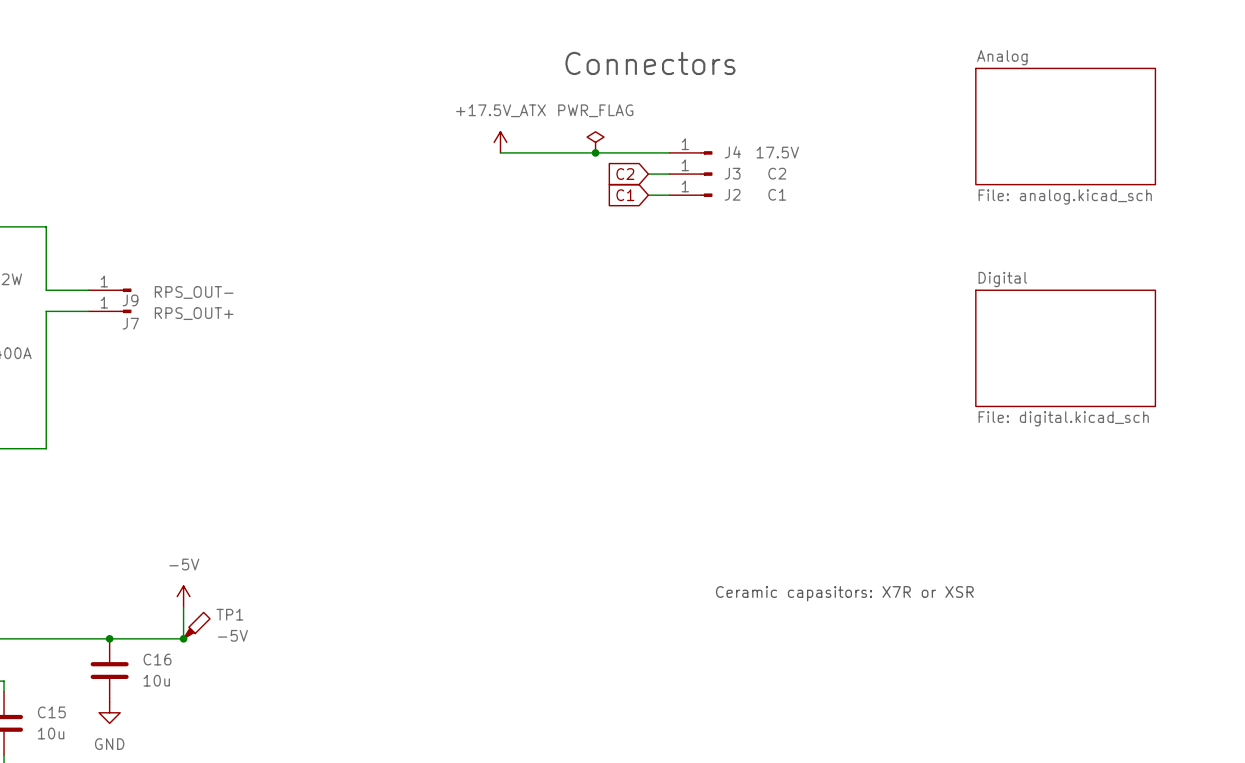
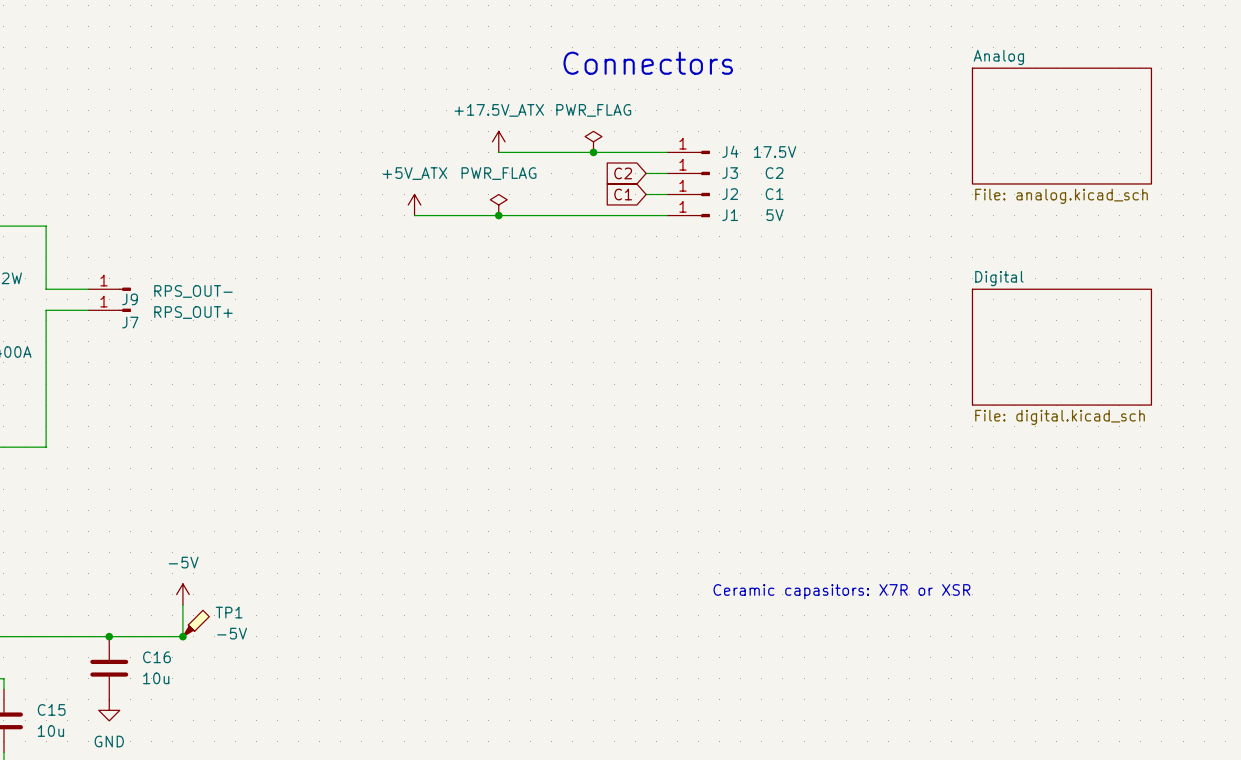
power symbol: none -> +5V_ATX (414, 205)
power symbol: none -> PWR_FLAG (498, 205)
wire: none -> (414, 215) (667, 215)
junction: none -> (498, 215)
J1: none -> 5V (688, 215)

